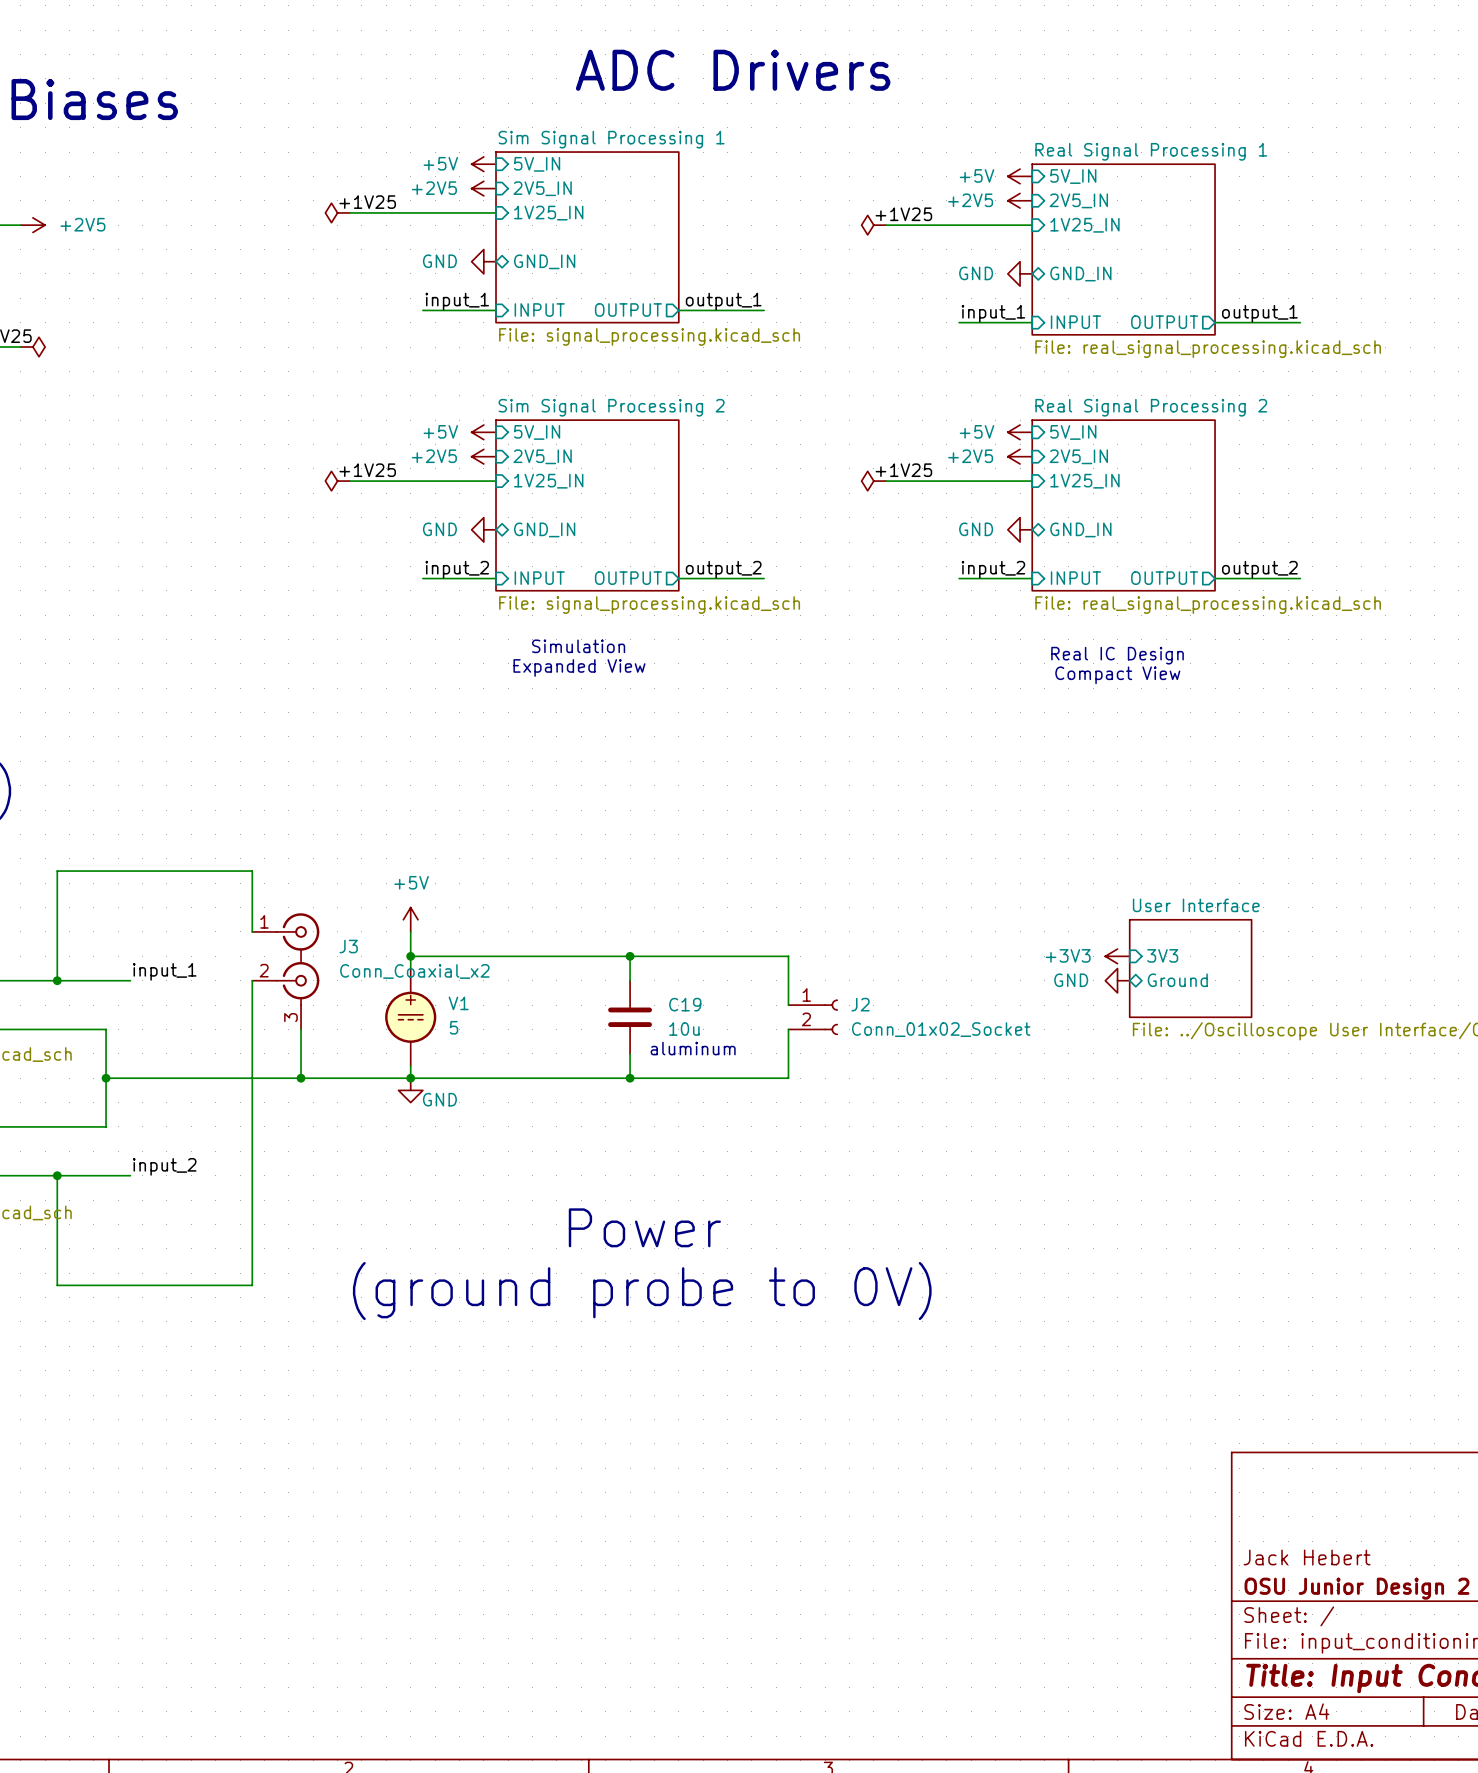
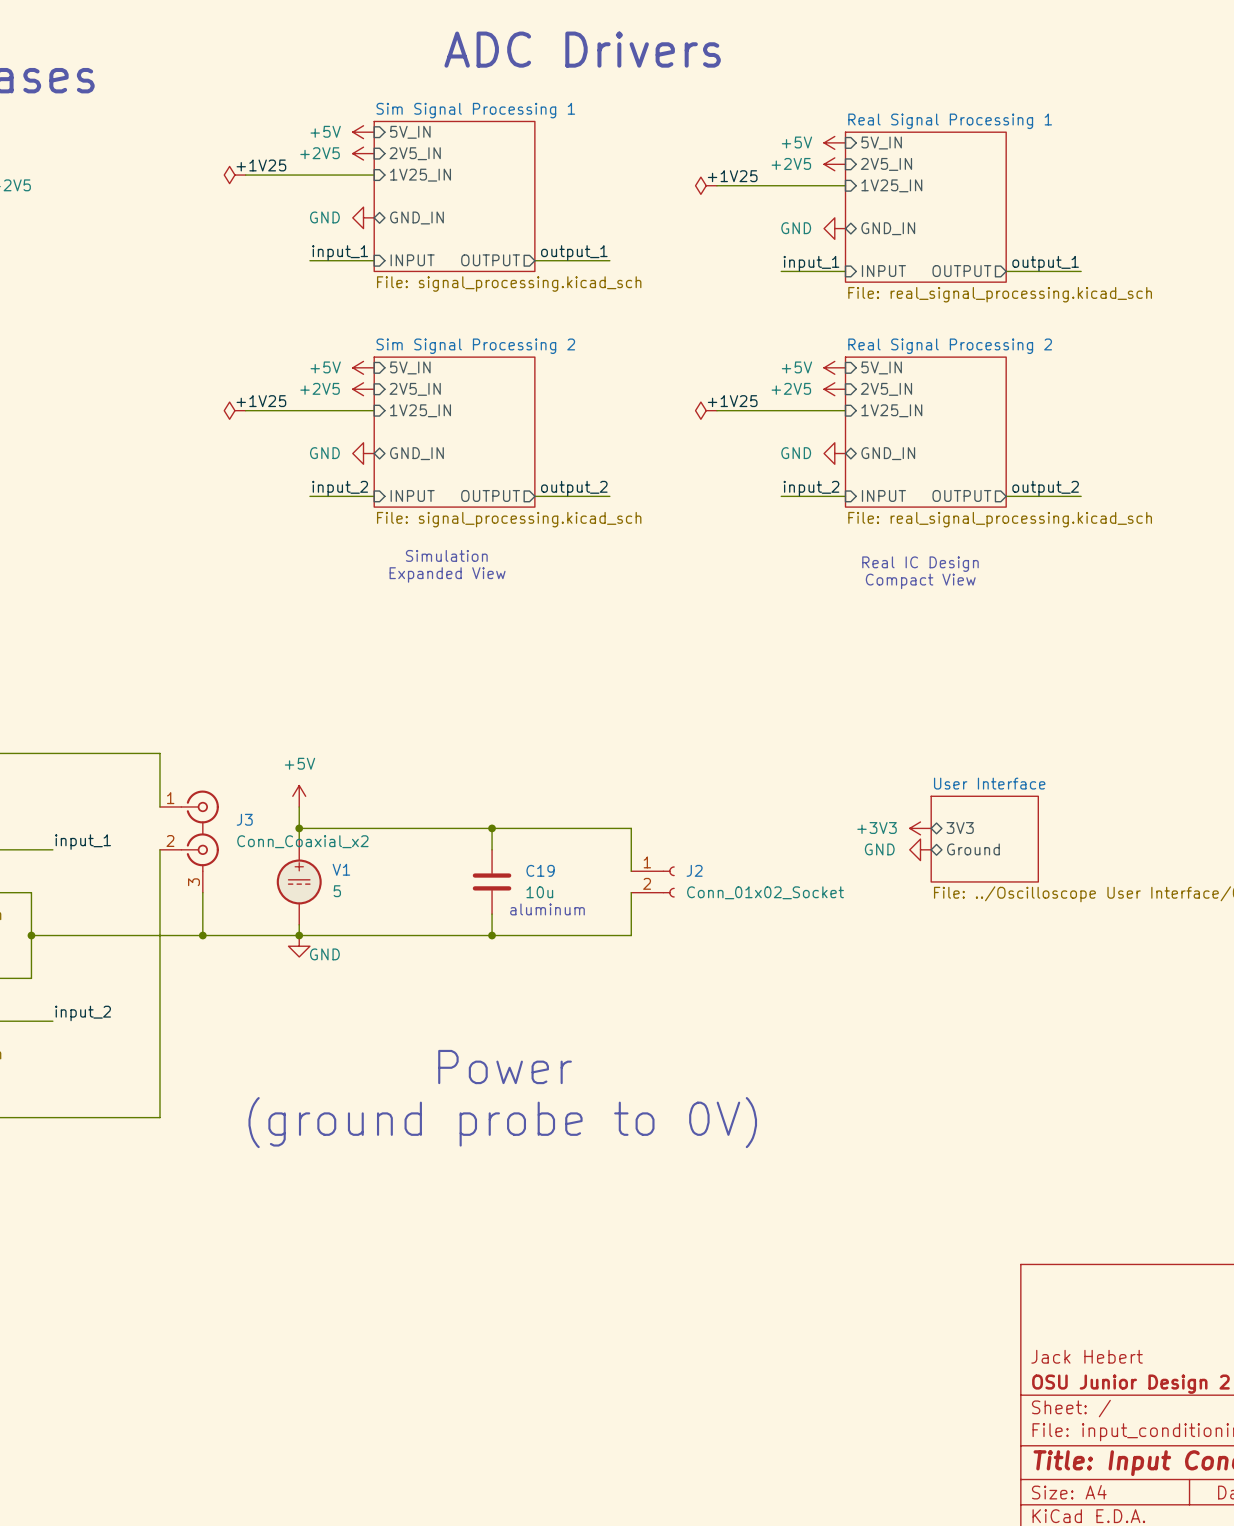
sheet pin shape: input (1162, 955) -> bidirectional (960, 828)

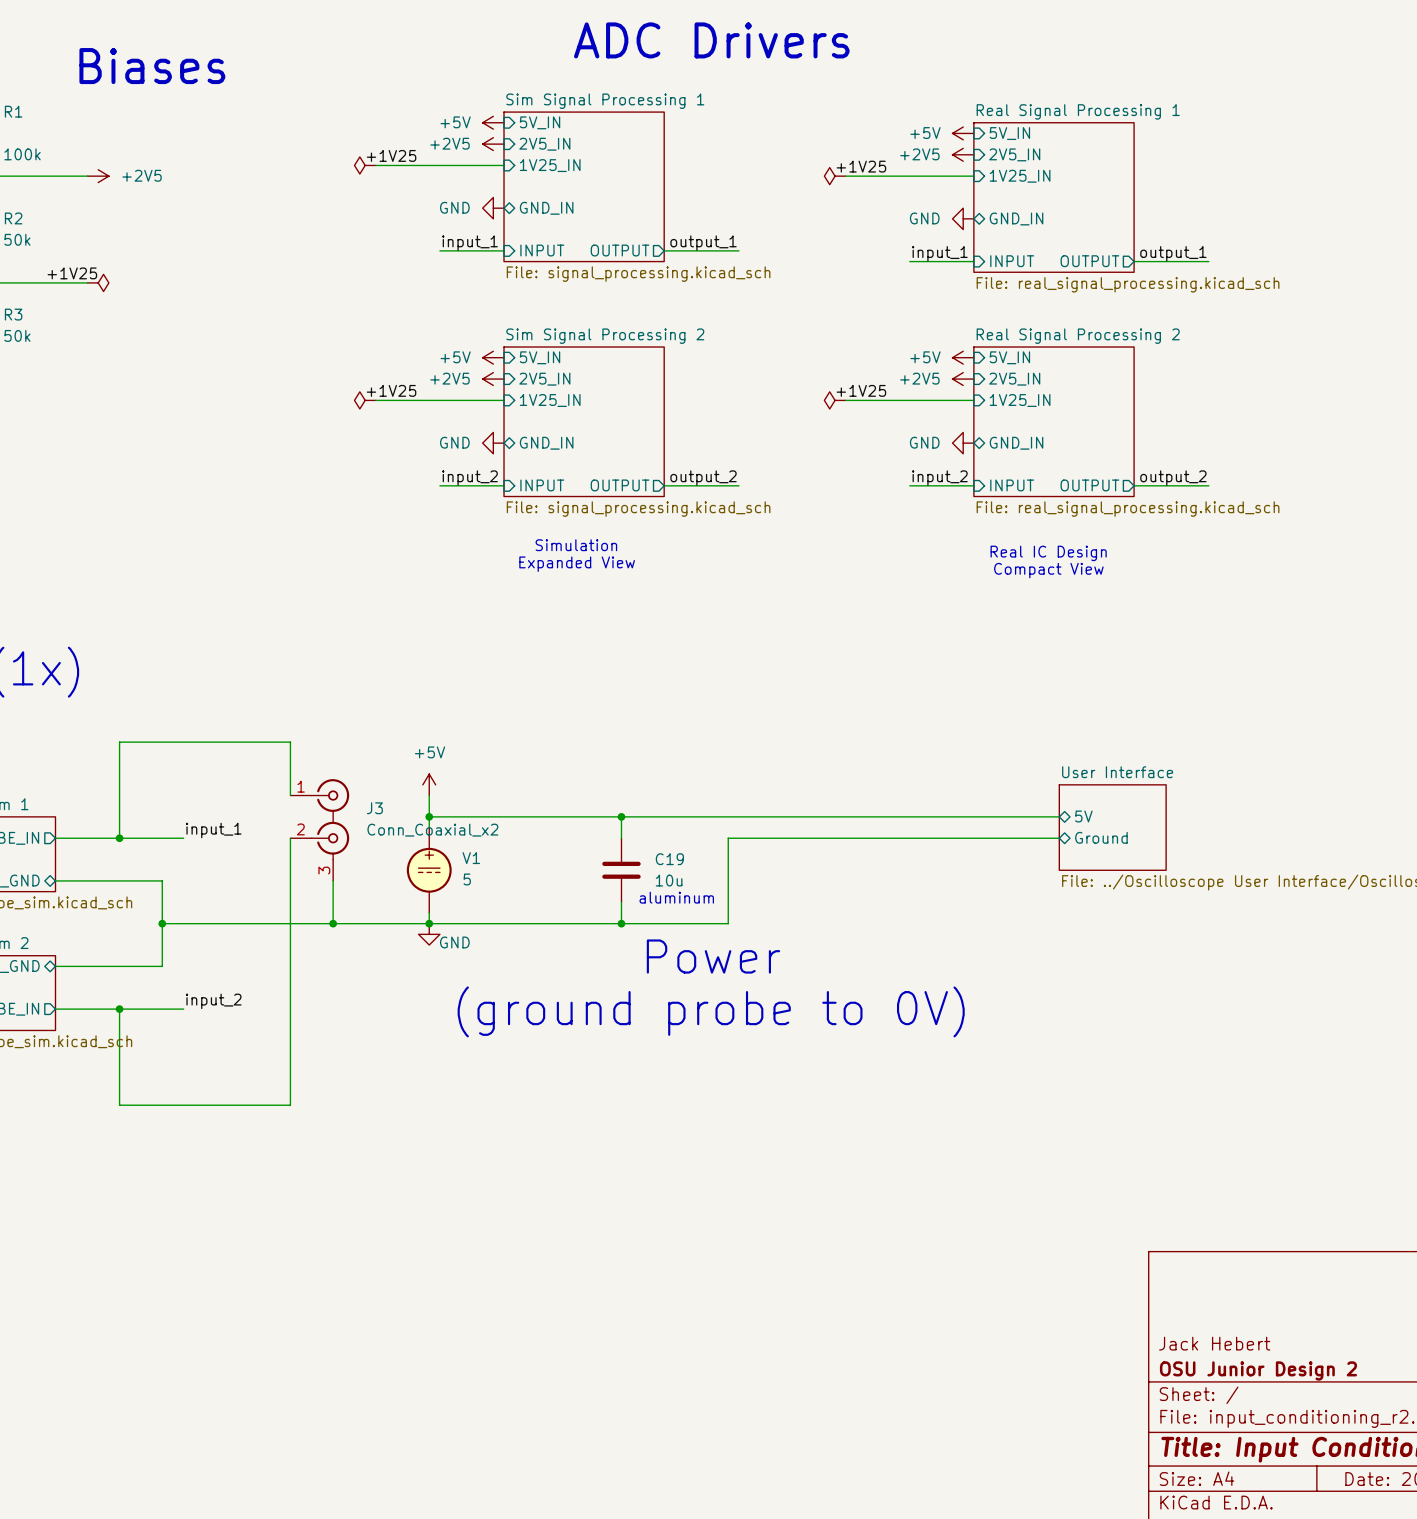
wire: (631, 828) (631, 871) -> (760, 816) (1059, 816)
power symbol: +3V3 (920, 828) -> none
sheet pin: 3V3 (960, 828) -> 5V (1083, 816)
power symbol: GND (920, 849) -> none
J2: Conn_01x02_Socket (653, 881) -> none
wire: (631, 892) (631, 935) (599, 935) -> (1059, 838) (728, 838) (728, 923)
text position: Power (505, 1067) -> Power (713, 956)
text position: (ground probe to 0V) (502, 1122) -> (ground probe to 0V) (711, 1011)

